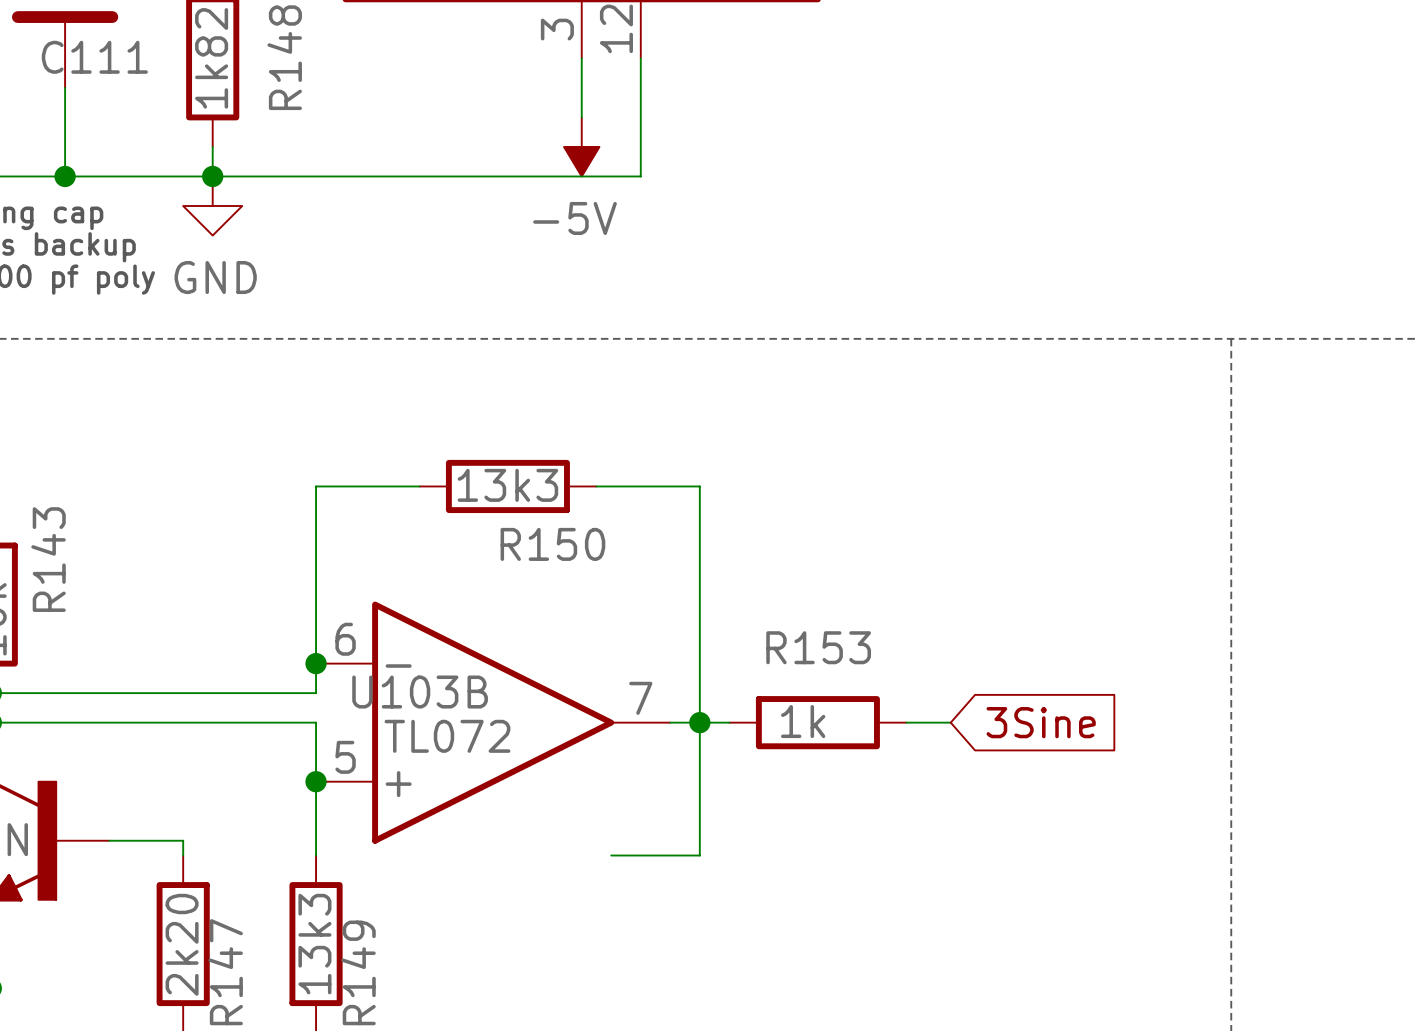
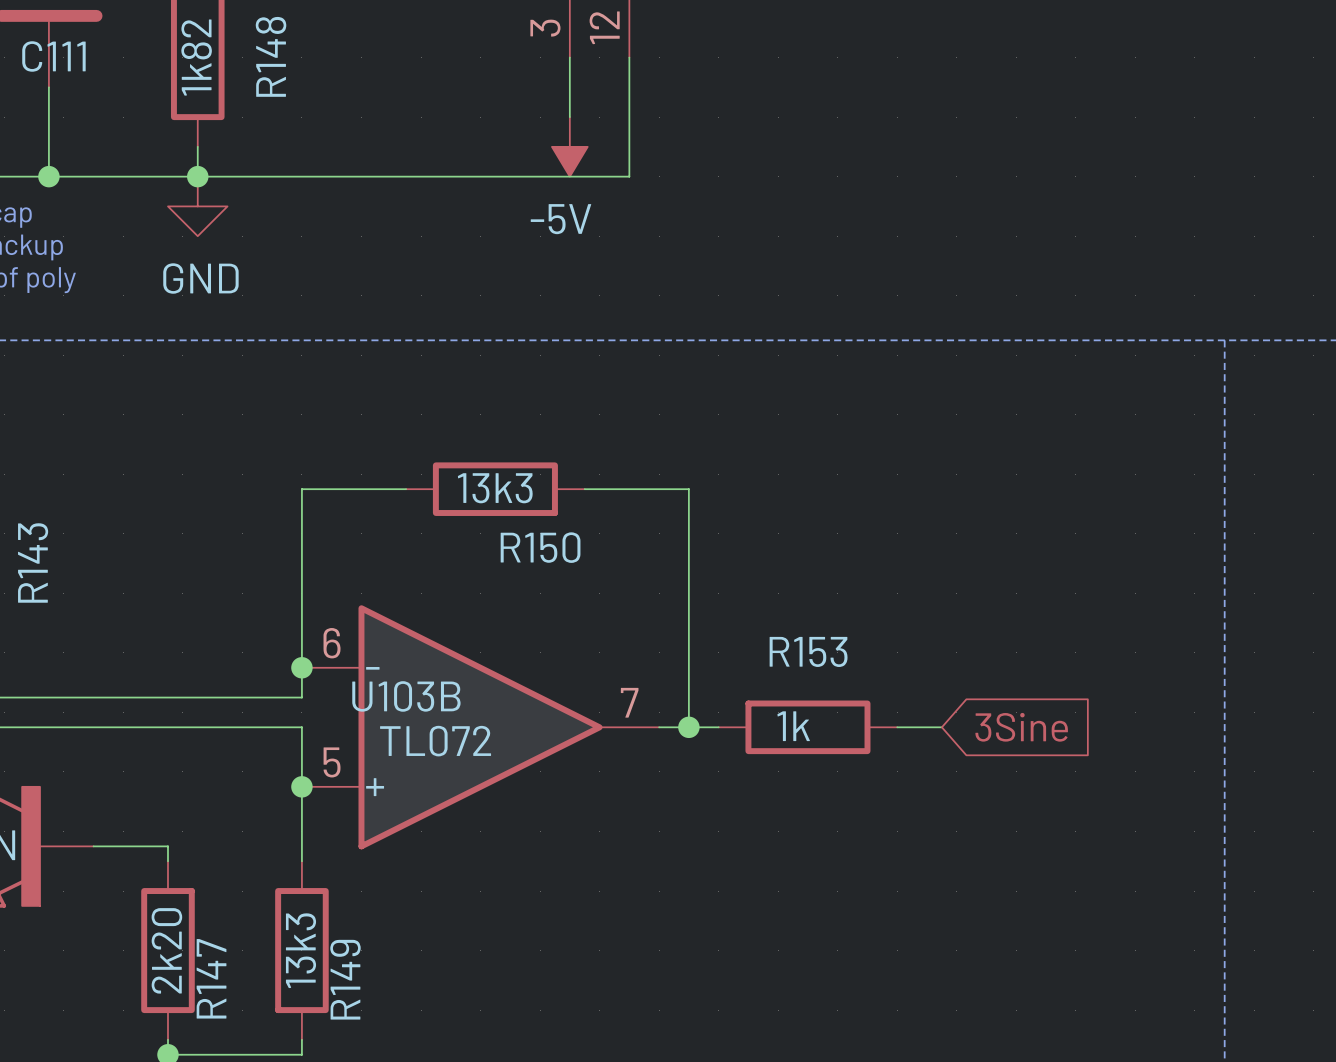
wire: (699, 722) (699, 855) (611, 855) -> none

